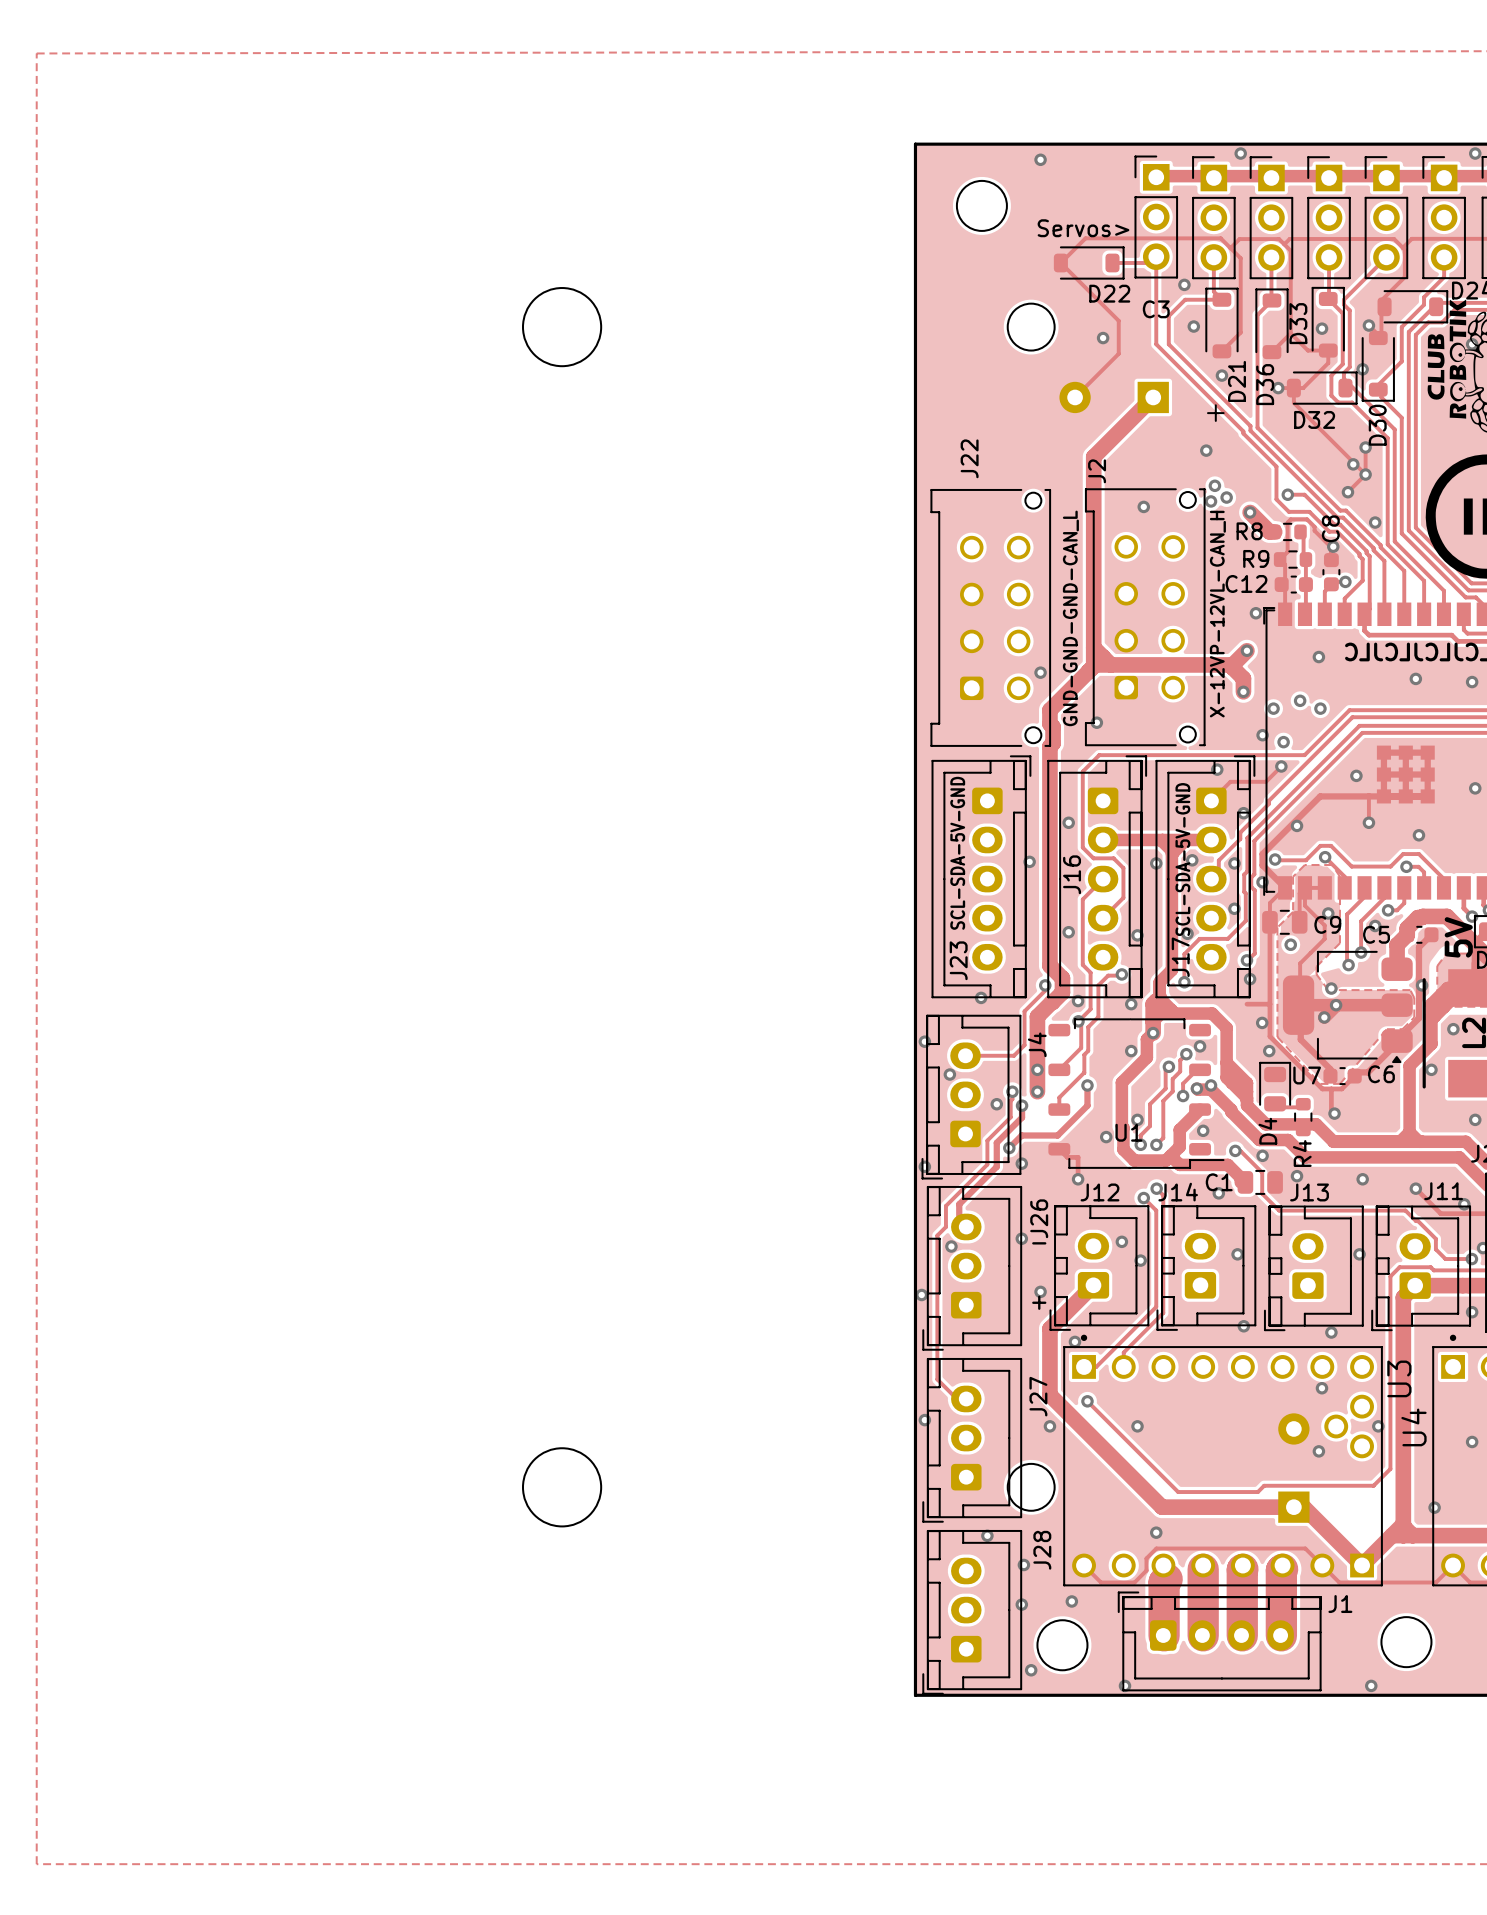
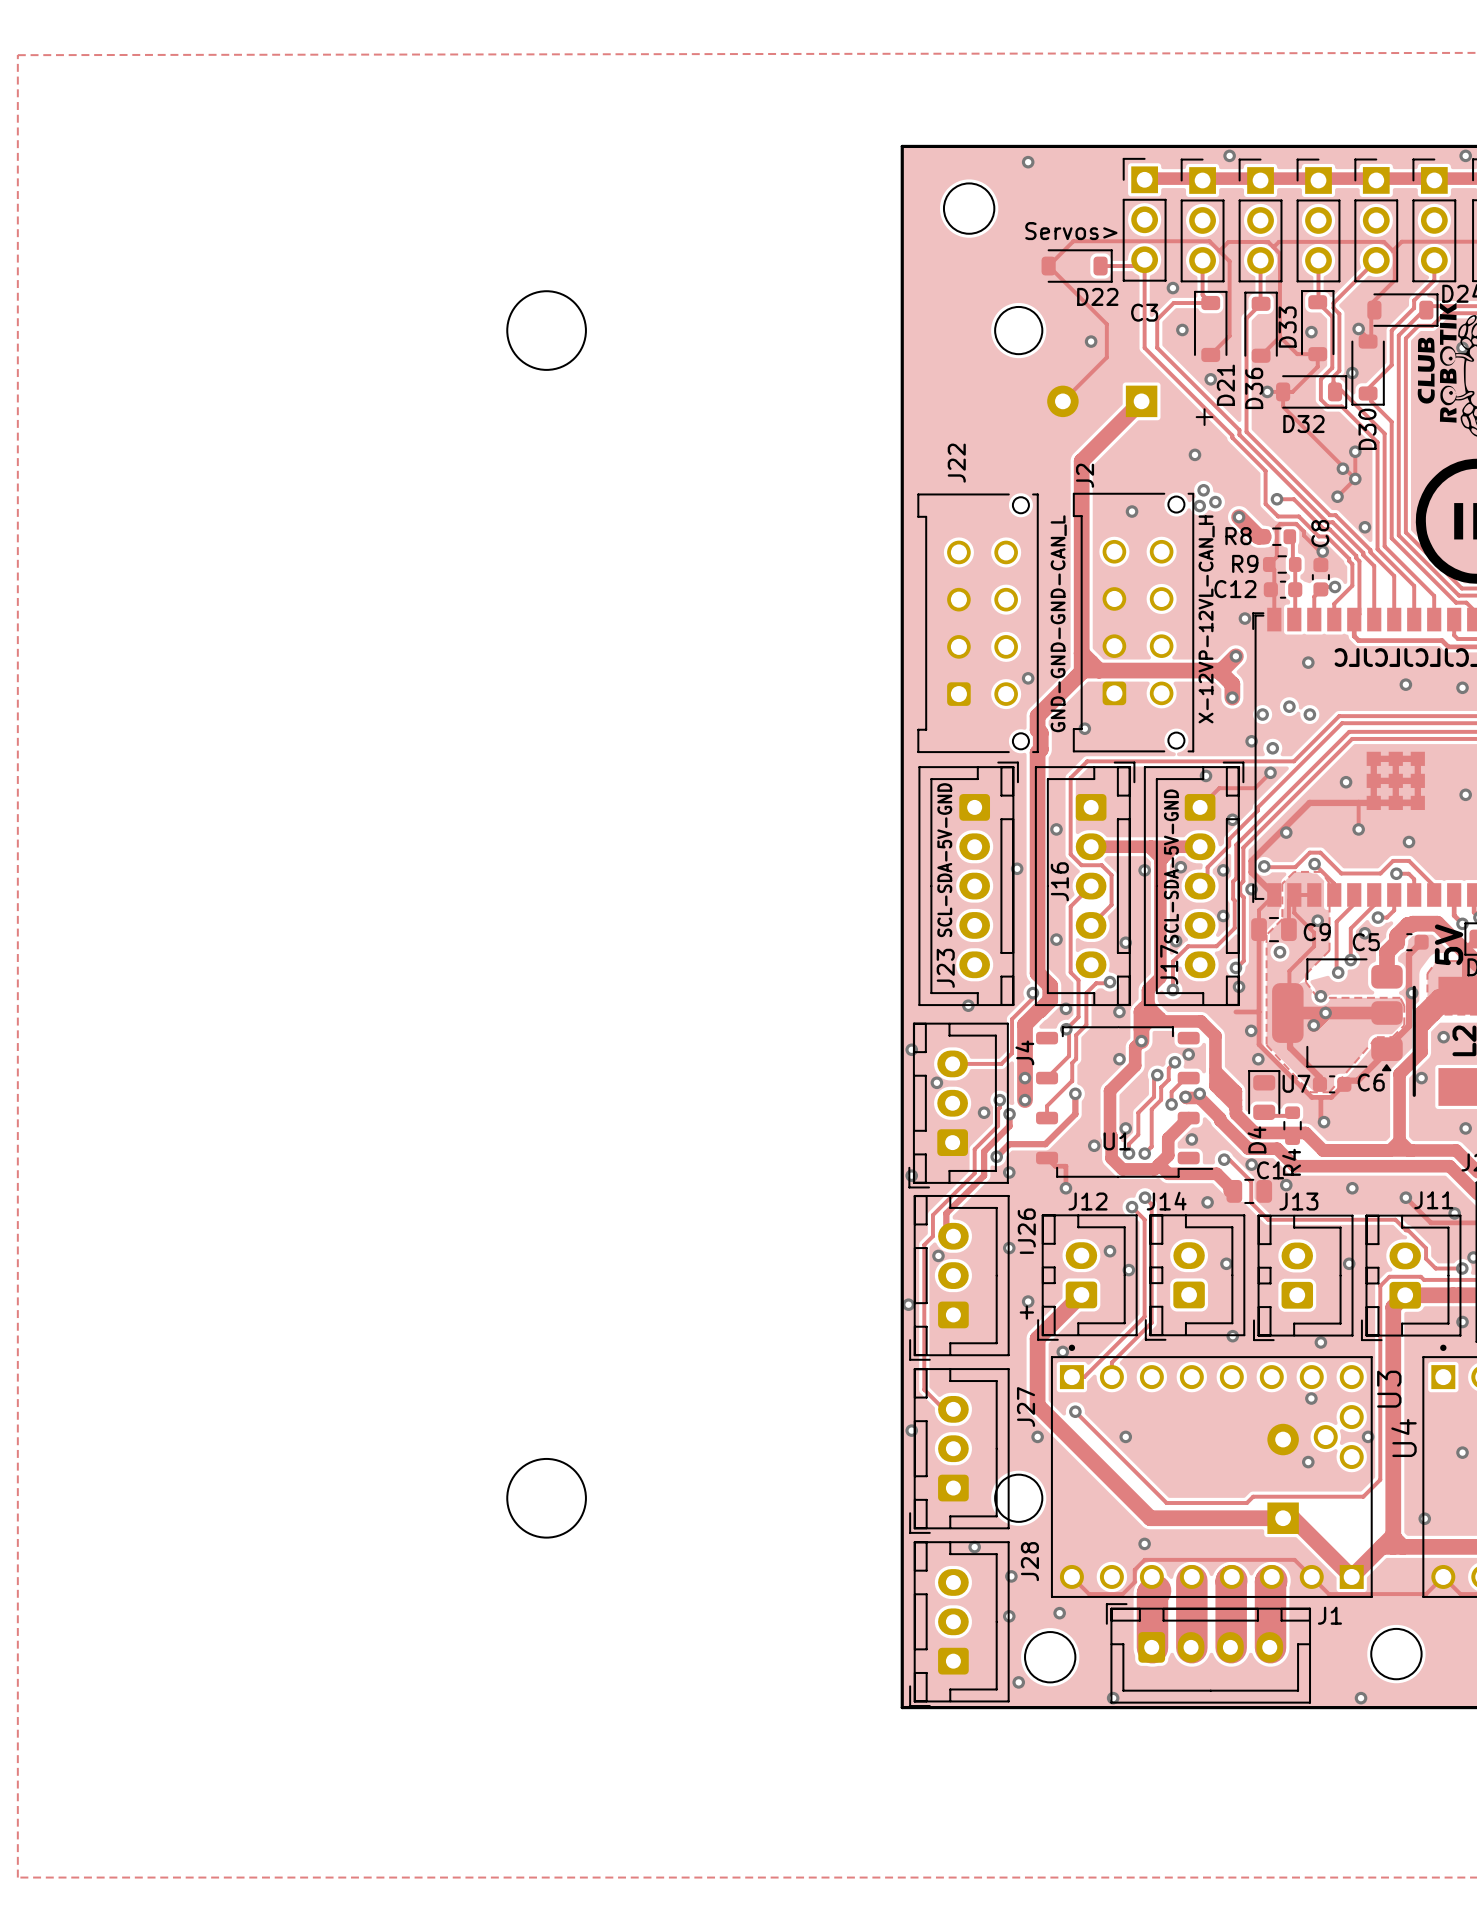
C1 name position: C1 (1219, 1182) -> C1 (1270, 1170)

